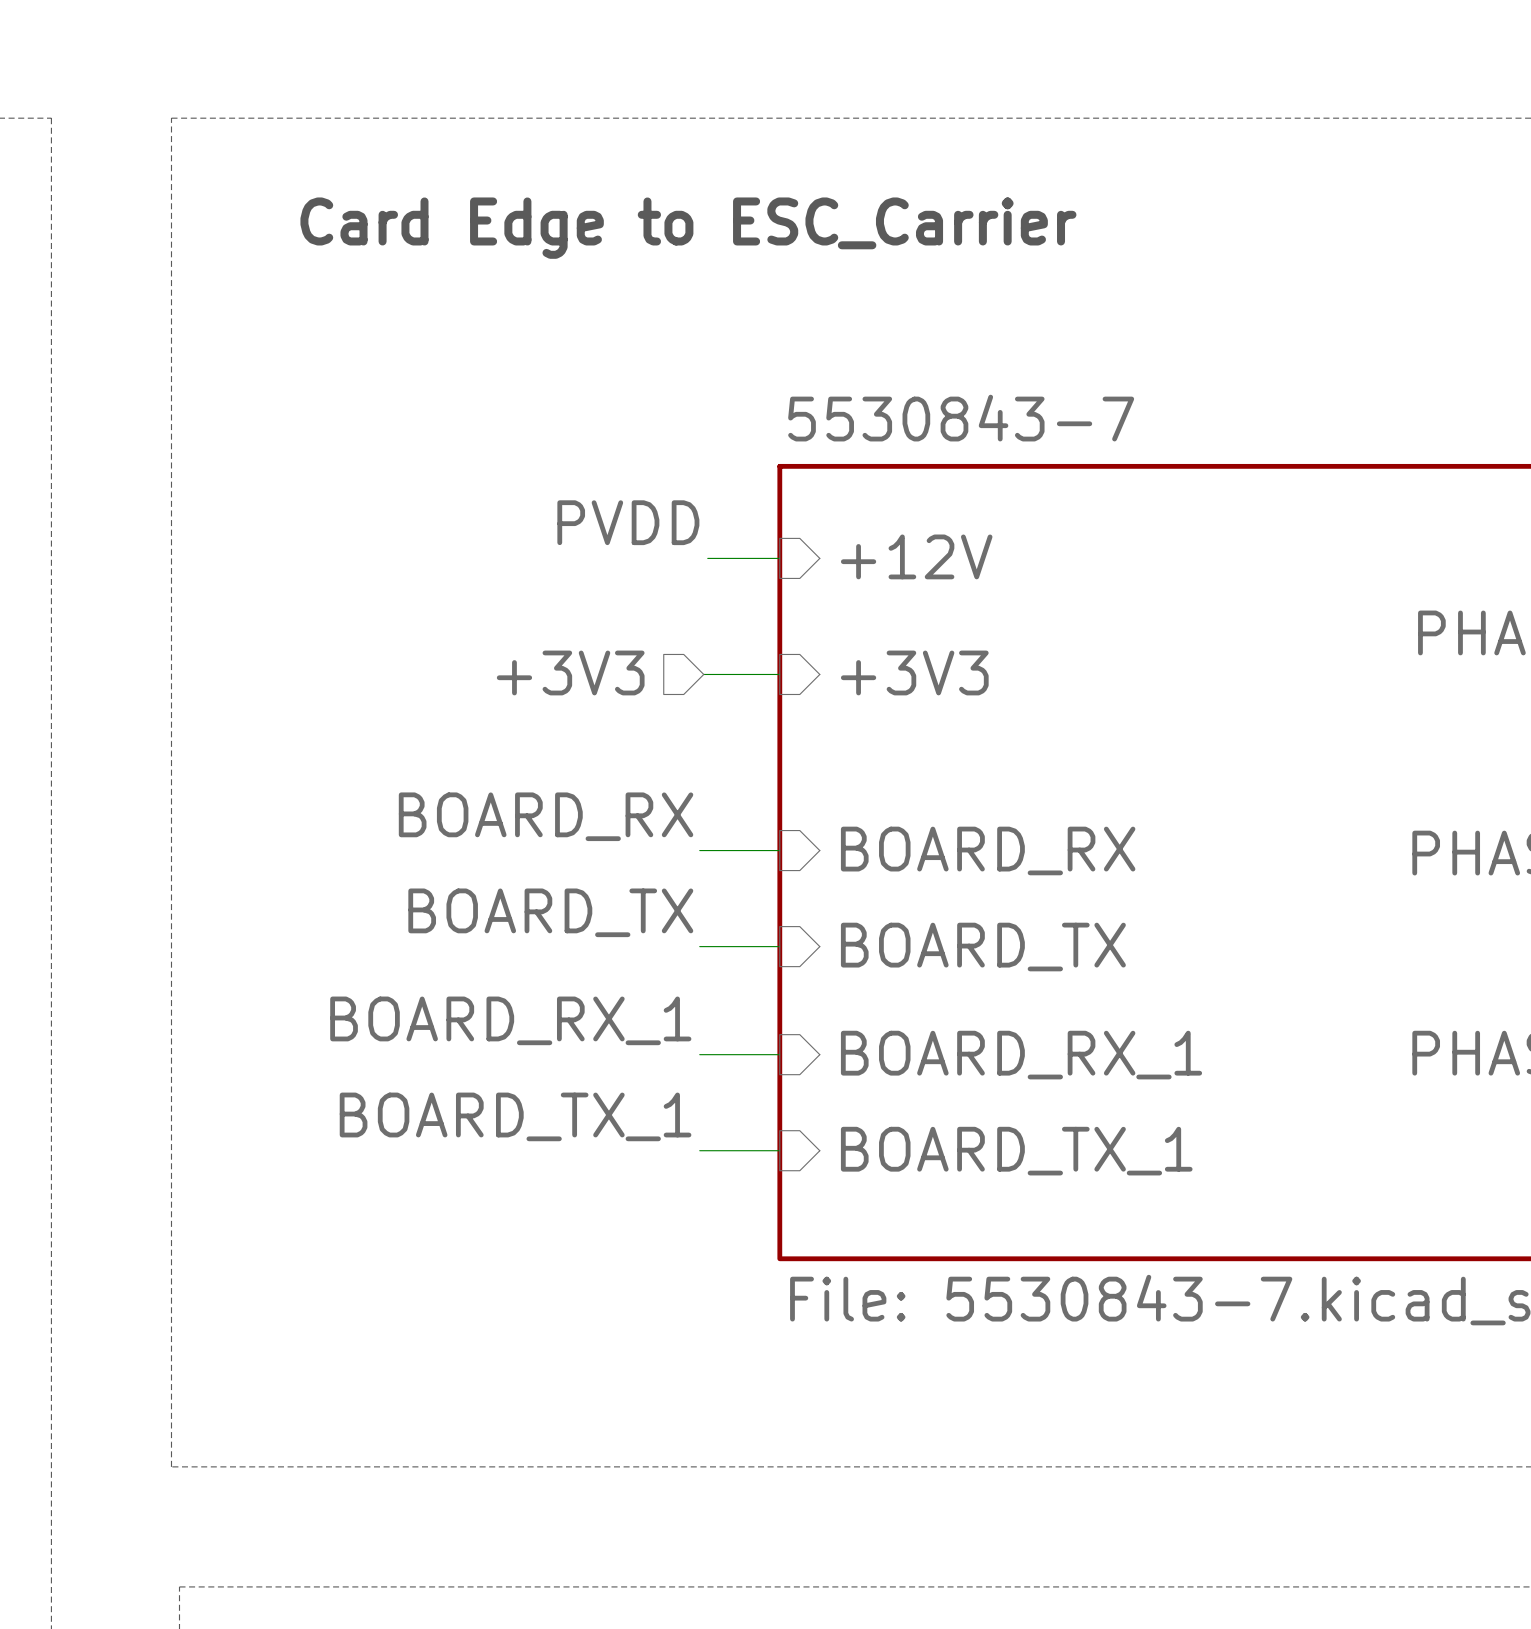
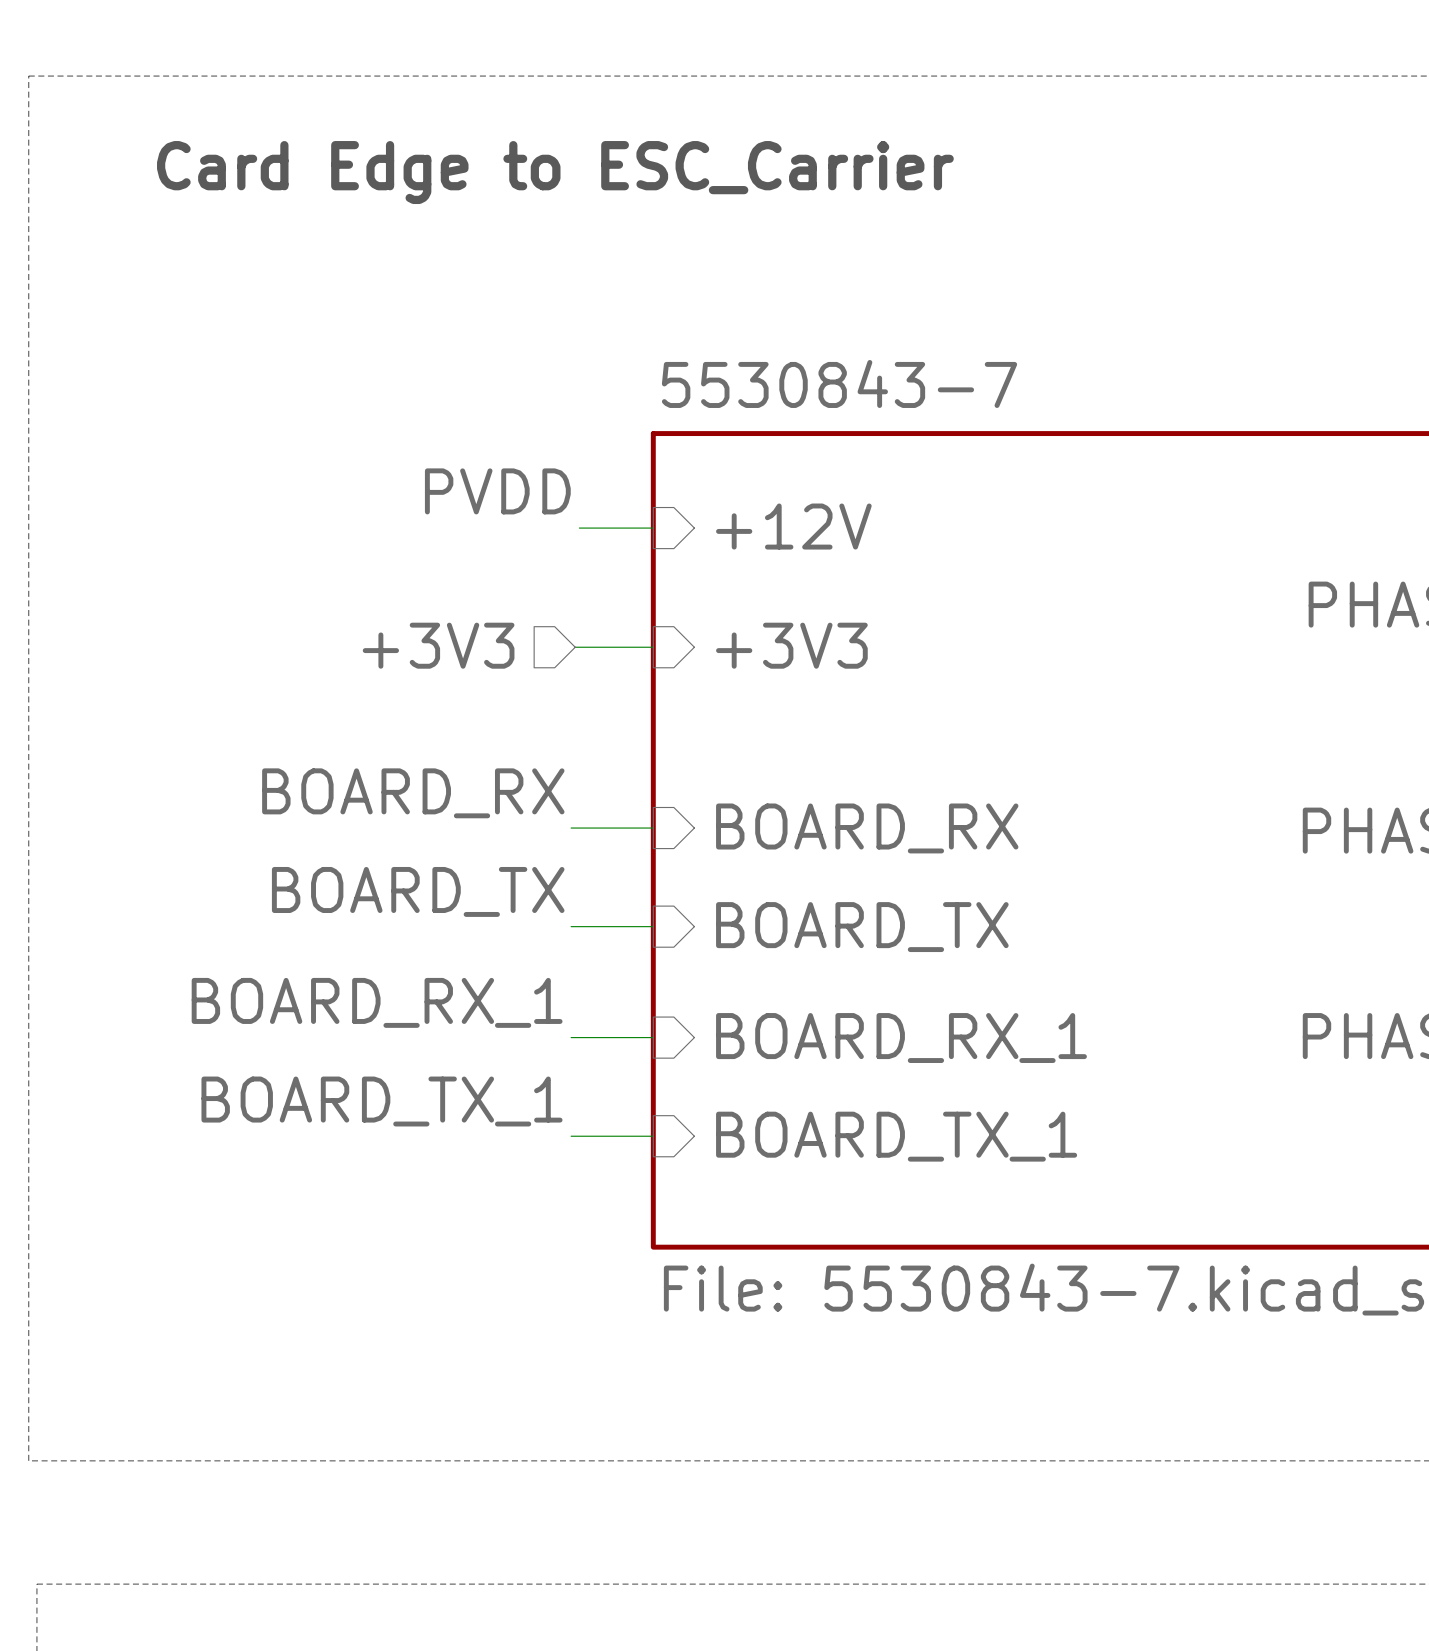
text position: Card Edge to ESC_Carrier (688, 228) -> Card Edge to ESC_Carrier (555, 172)

